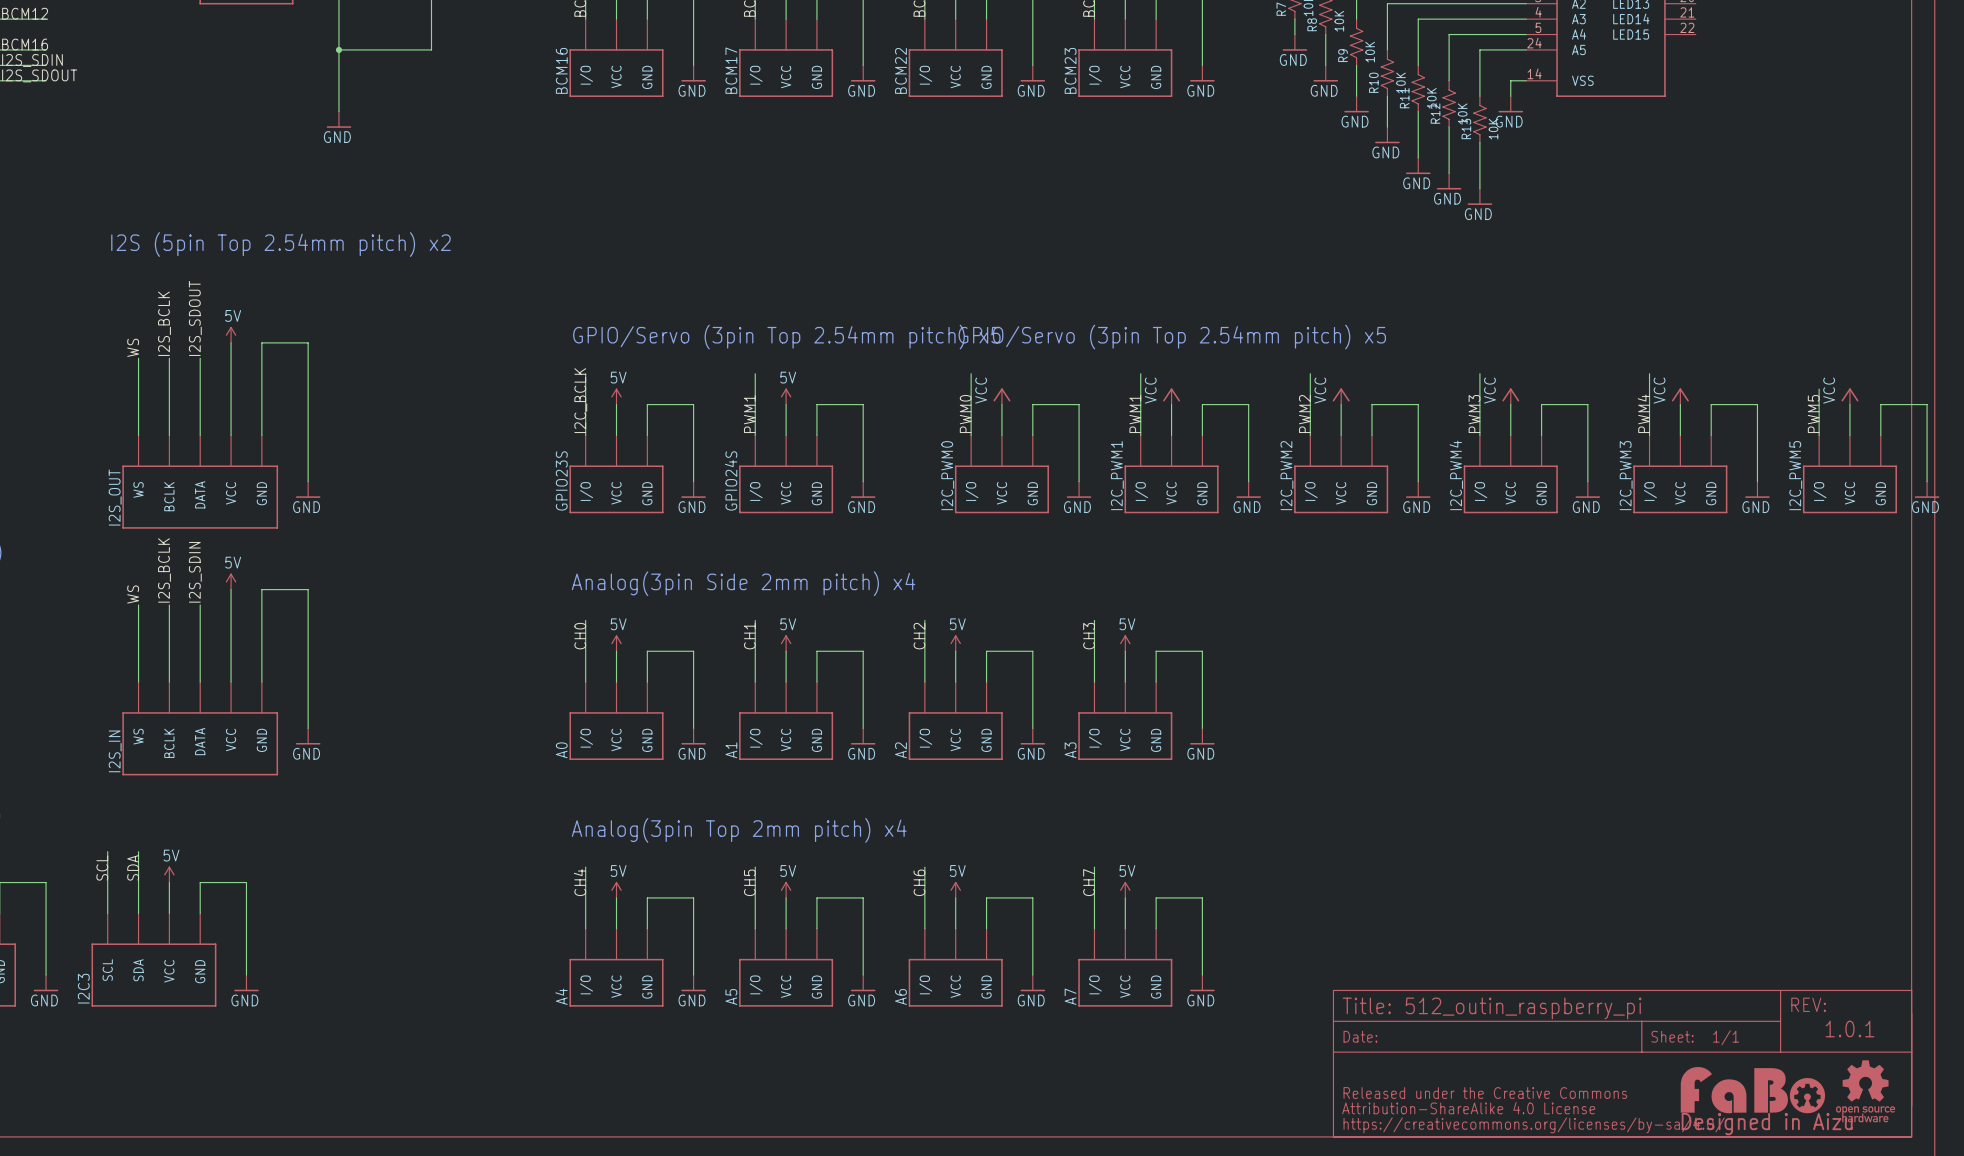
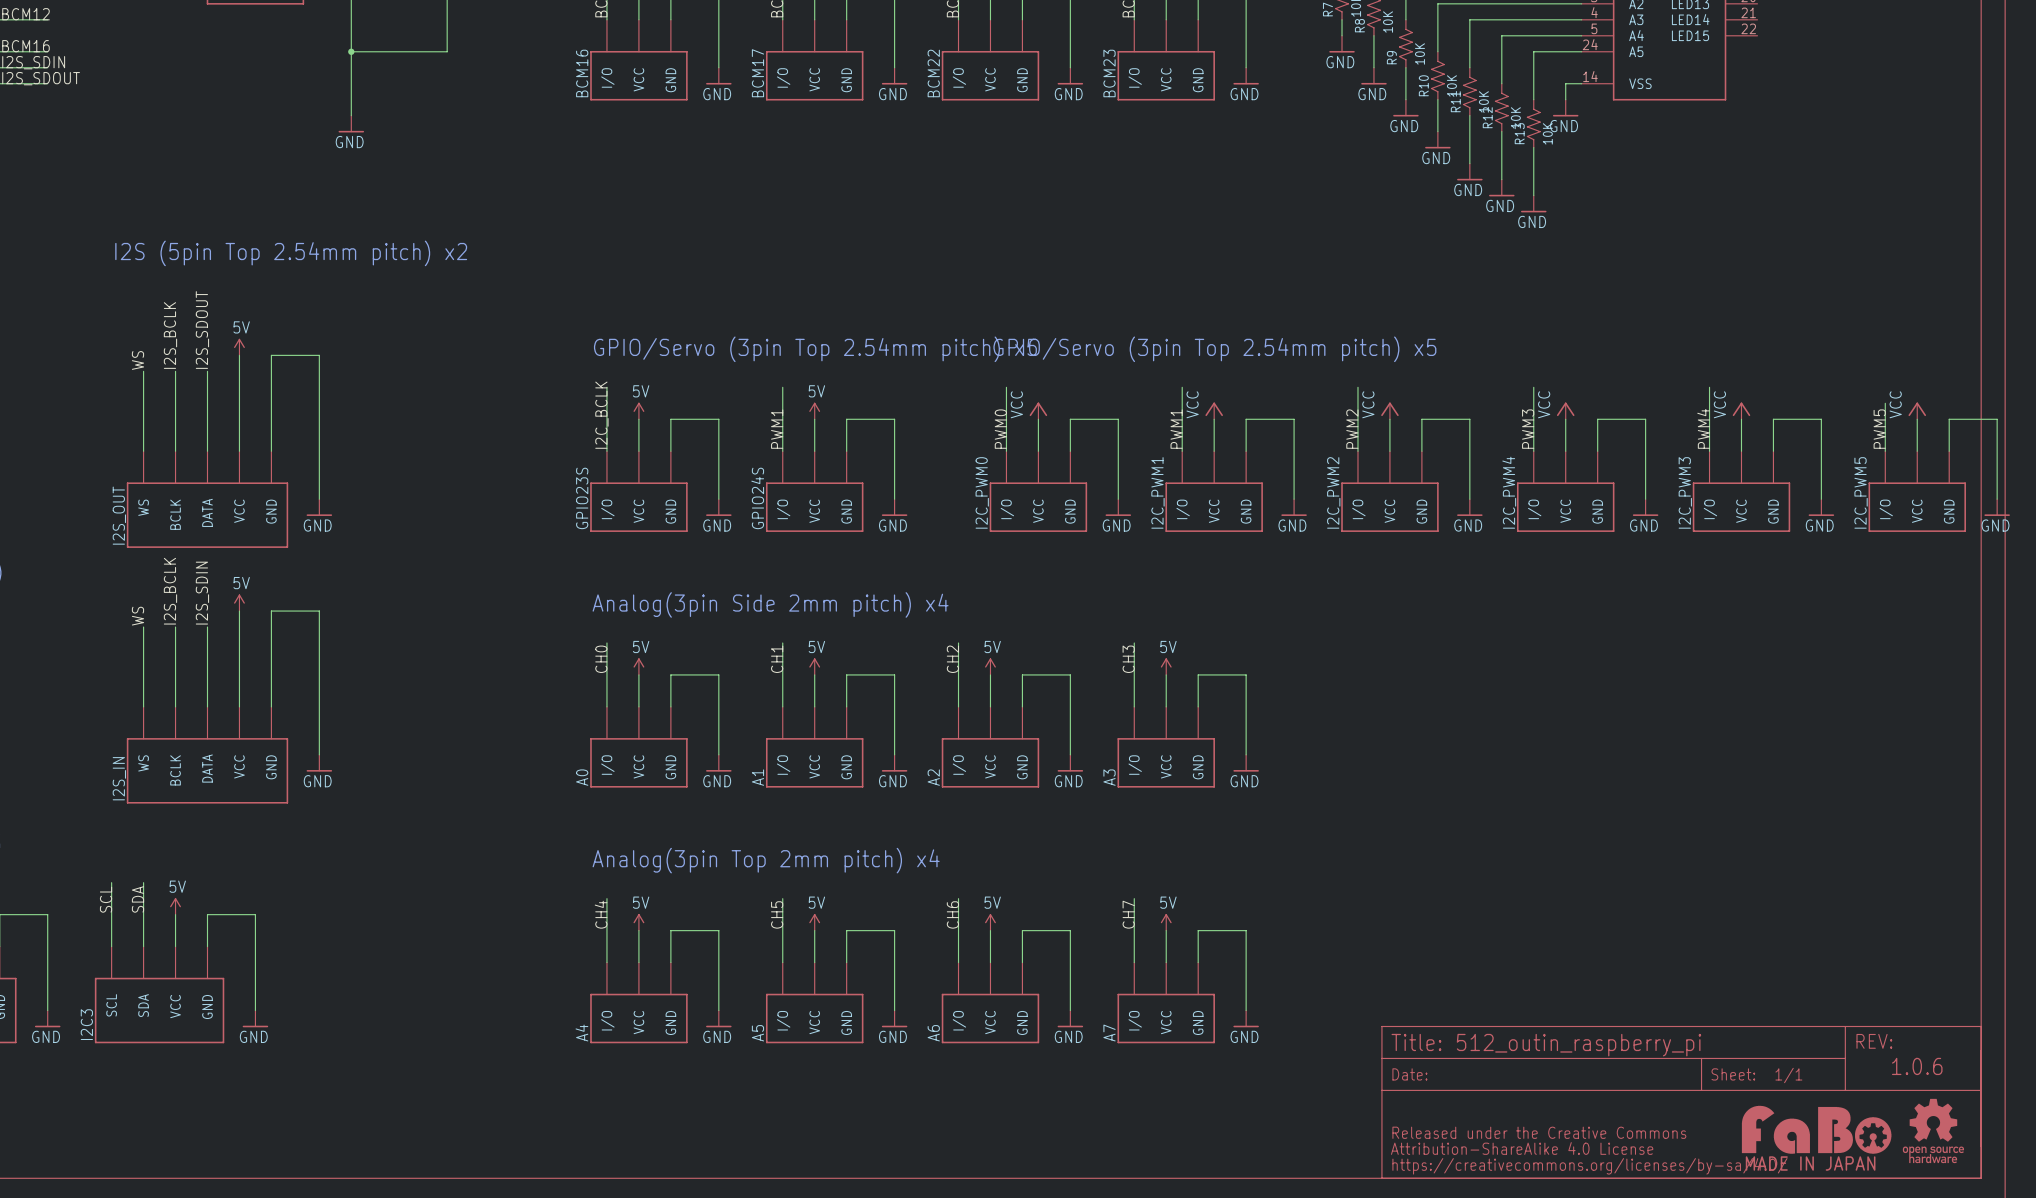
text: 1.0.1 (1849, 1029) -> 1.0.6 (1917, 1066)
part text: none -> MADE IN JAPAN (1810, 1163)
part text: Designed in Aizu (1767, 1124) -> none

